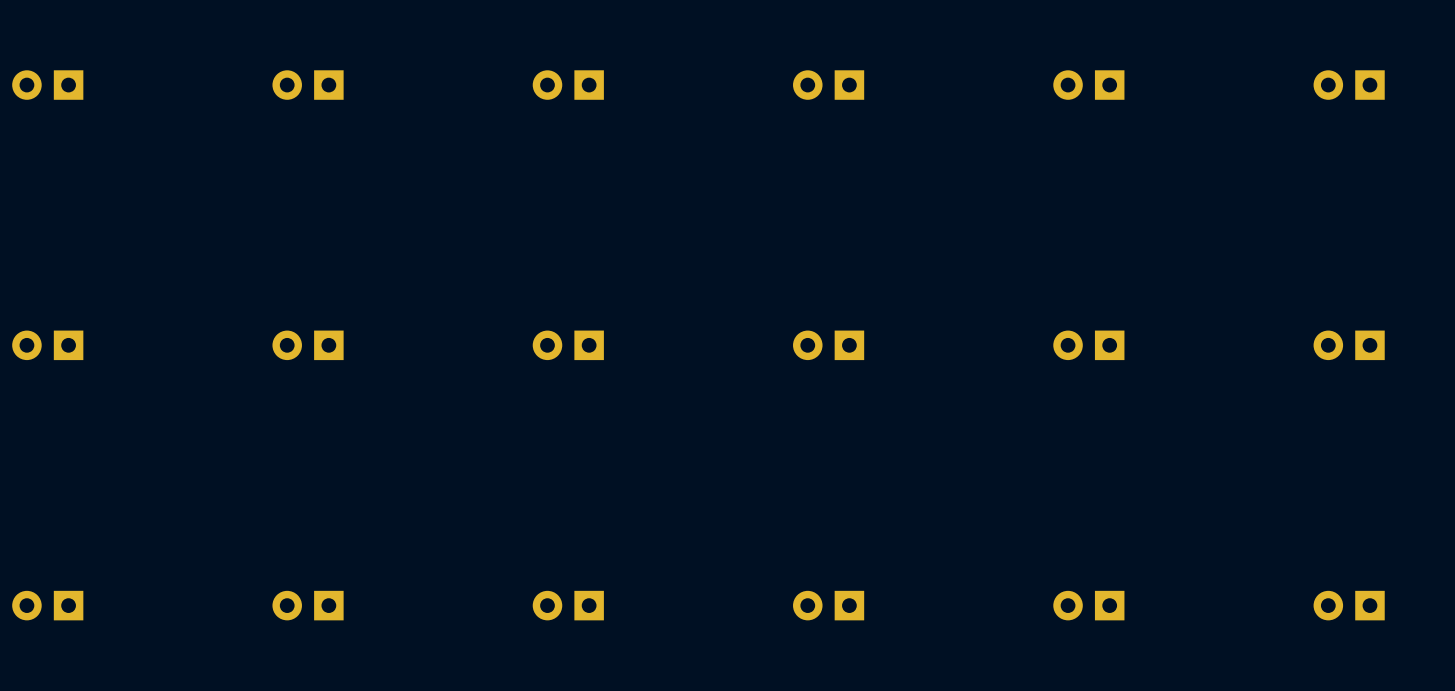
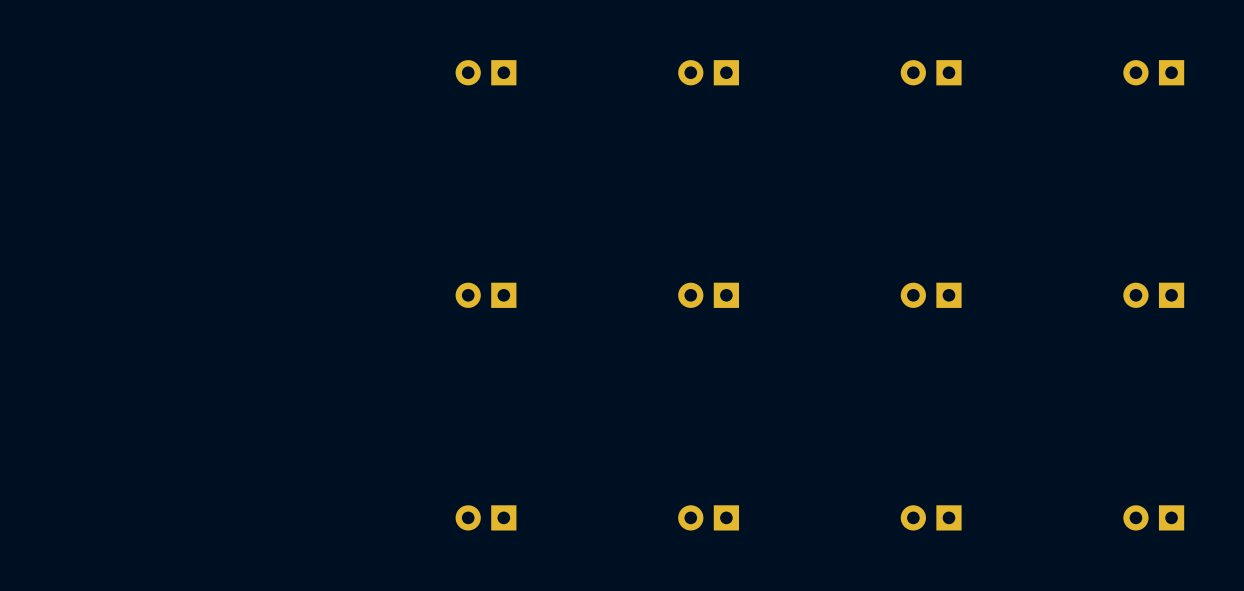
part: (47, 85) -> none
part: (308, 85) -> none
part: (47, 345) -> none
part: (308, 345) -> none
part: (47, 605) -> none
part: (308, 605) -> none

